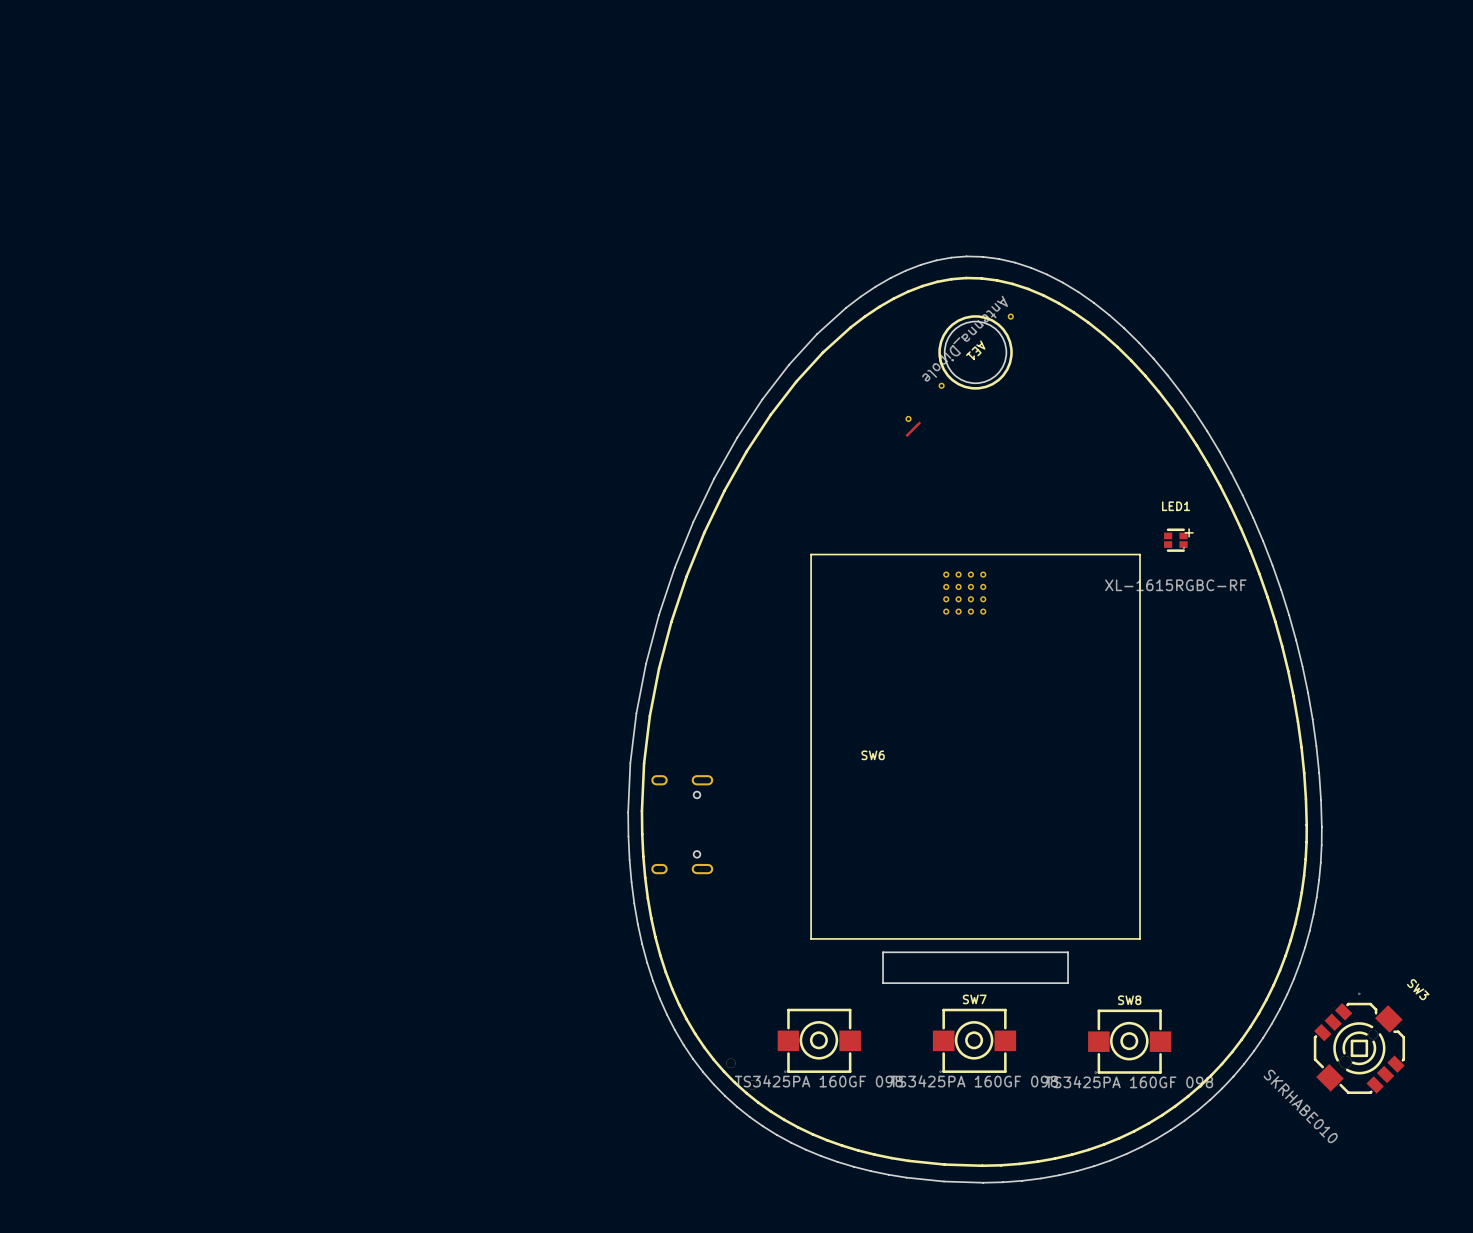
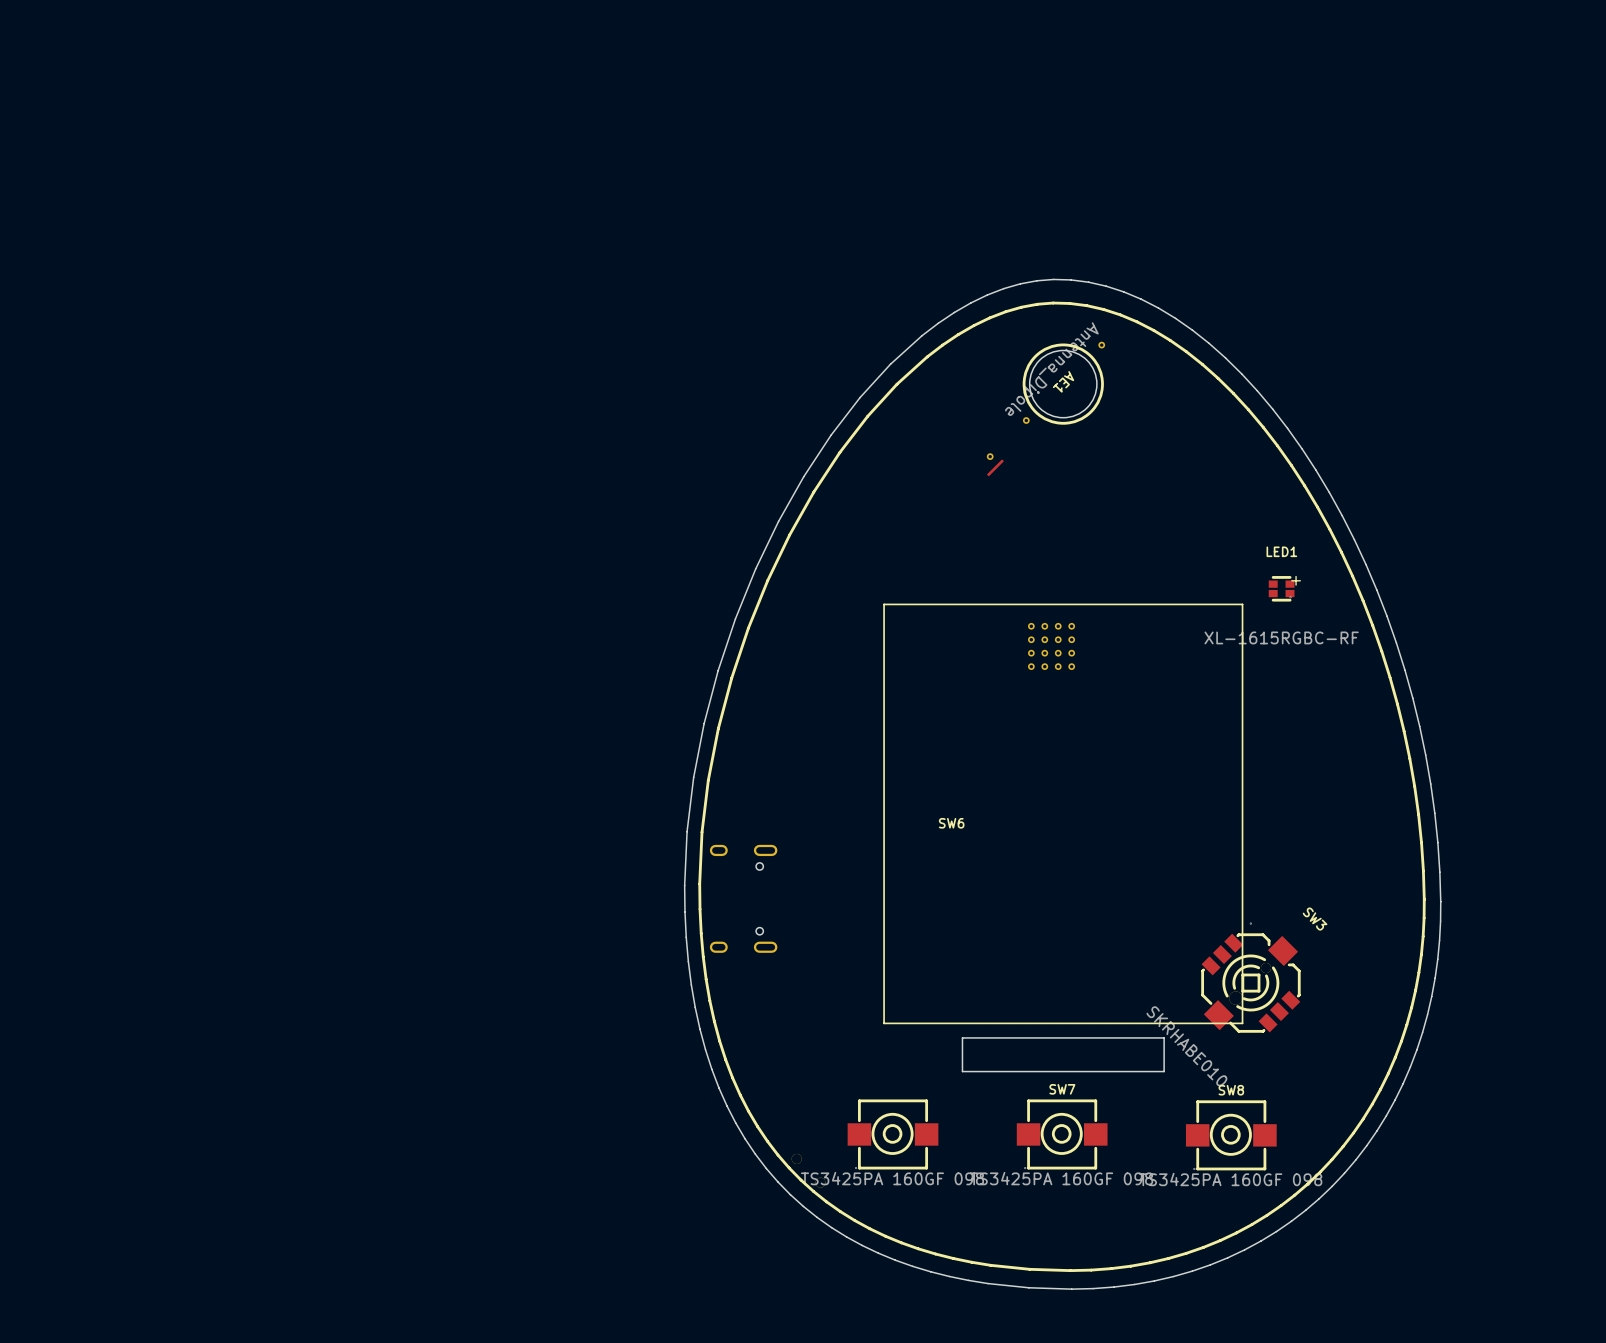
SW3 position: (1359, 1043) -> (1250, 977)

